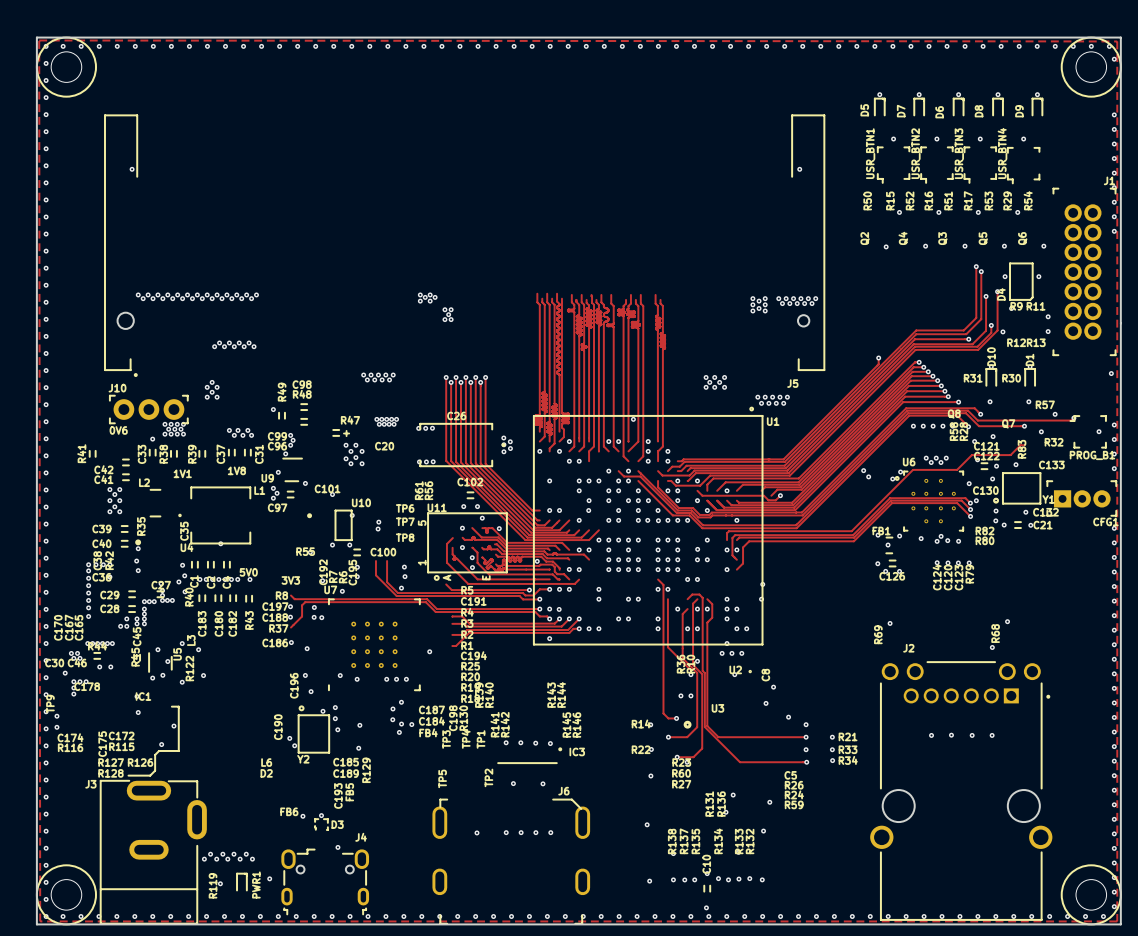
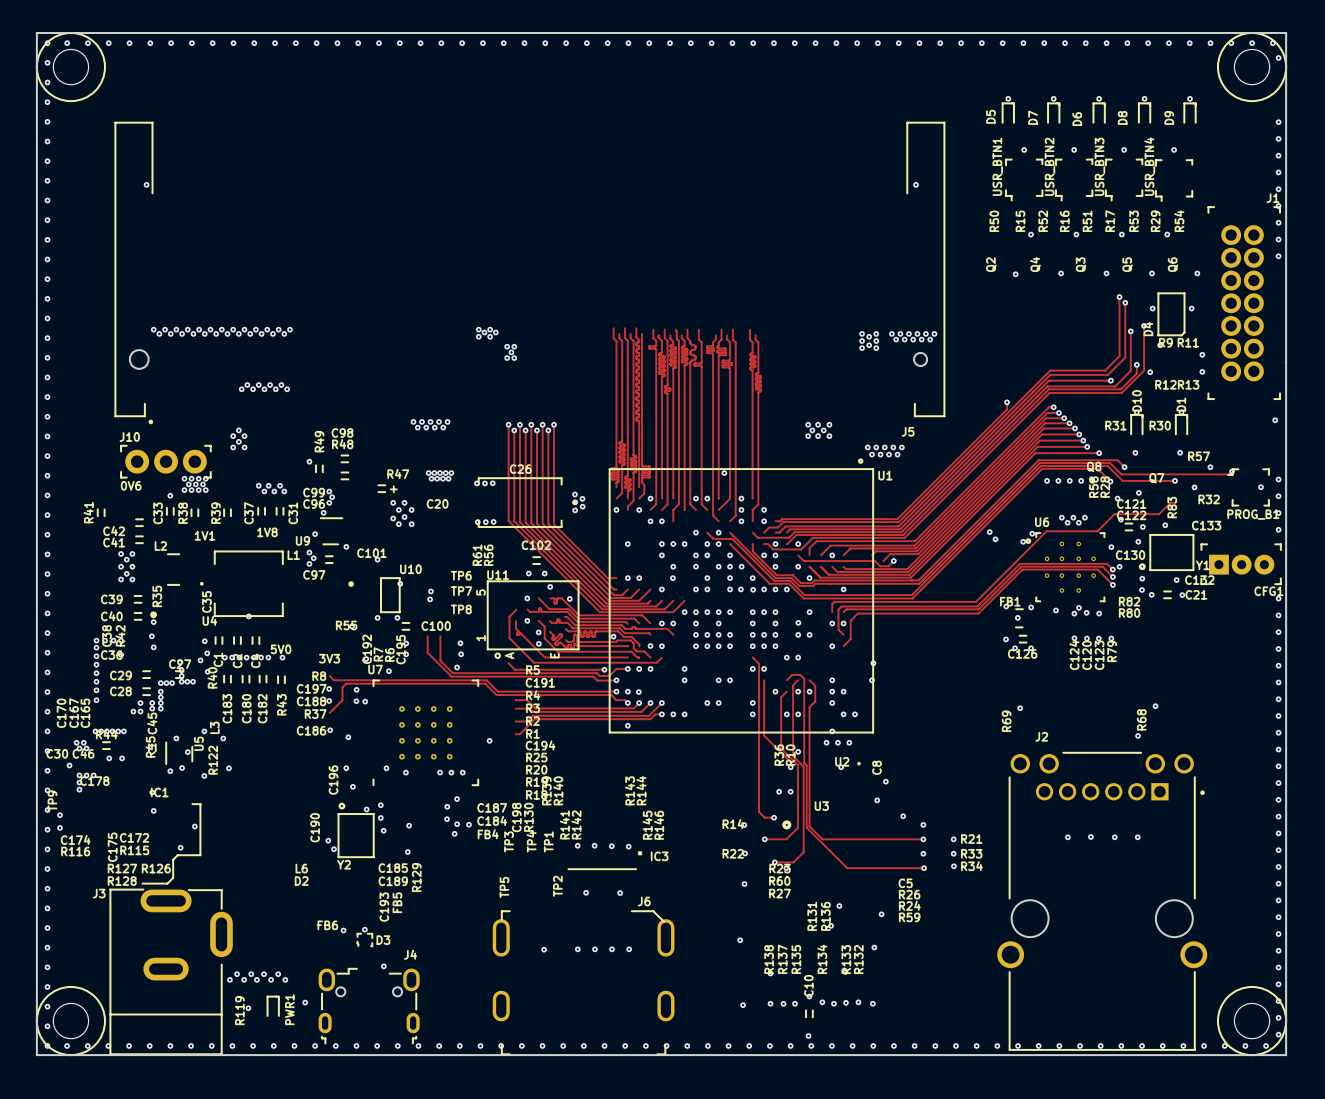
zone outline: (39, 40) (40, 921) (1117, 921) (1117, 41) (39, 40) -> none

